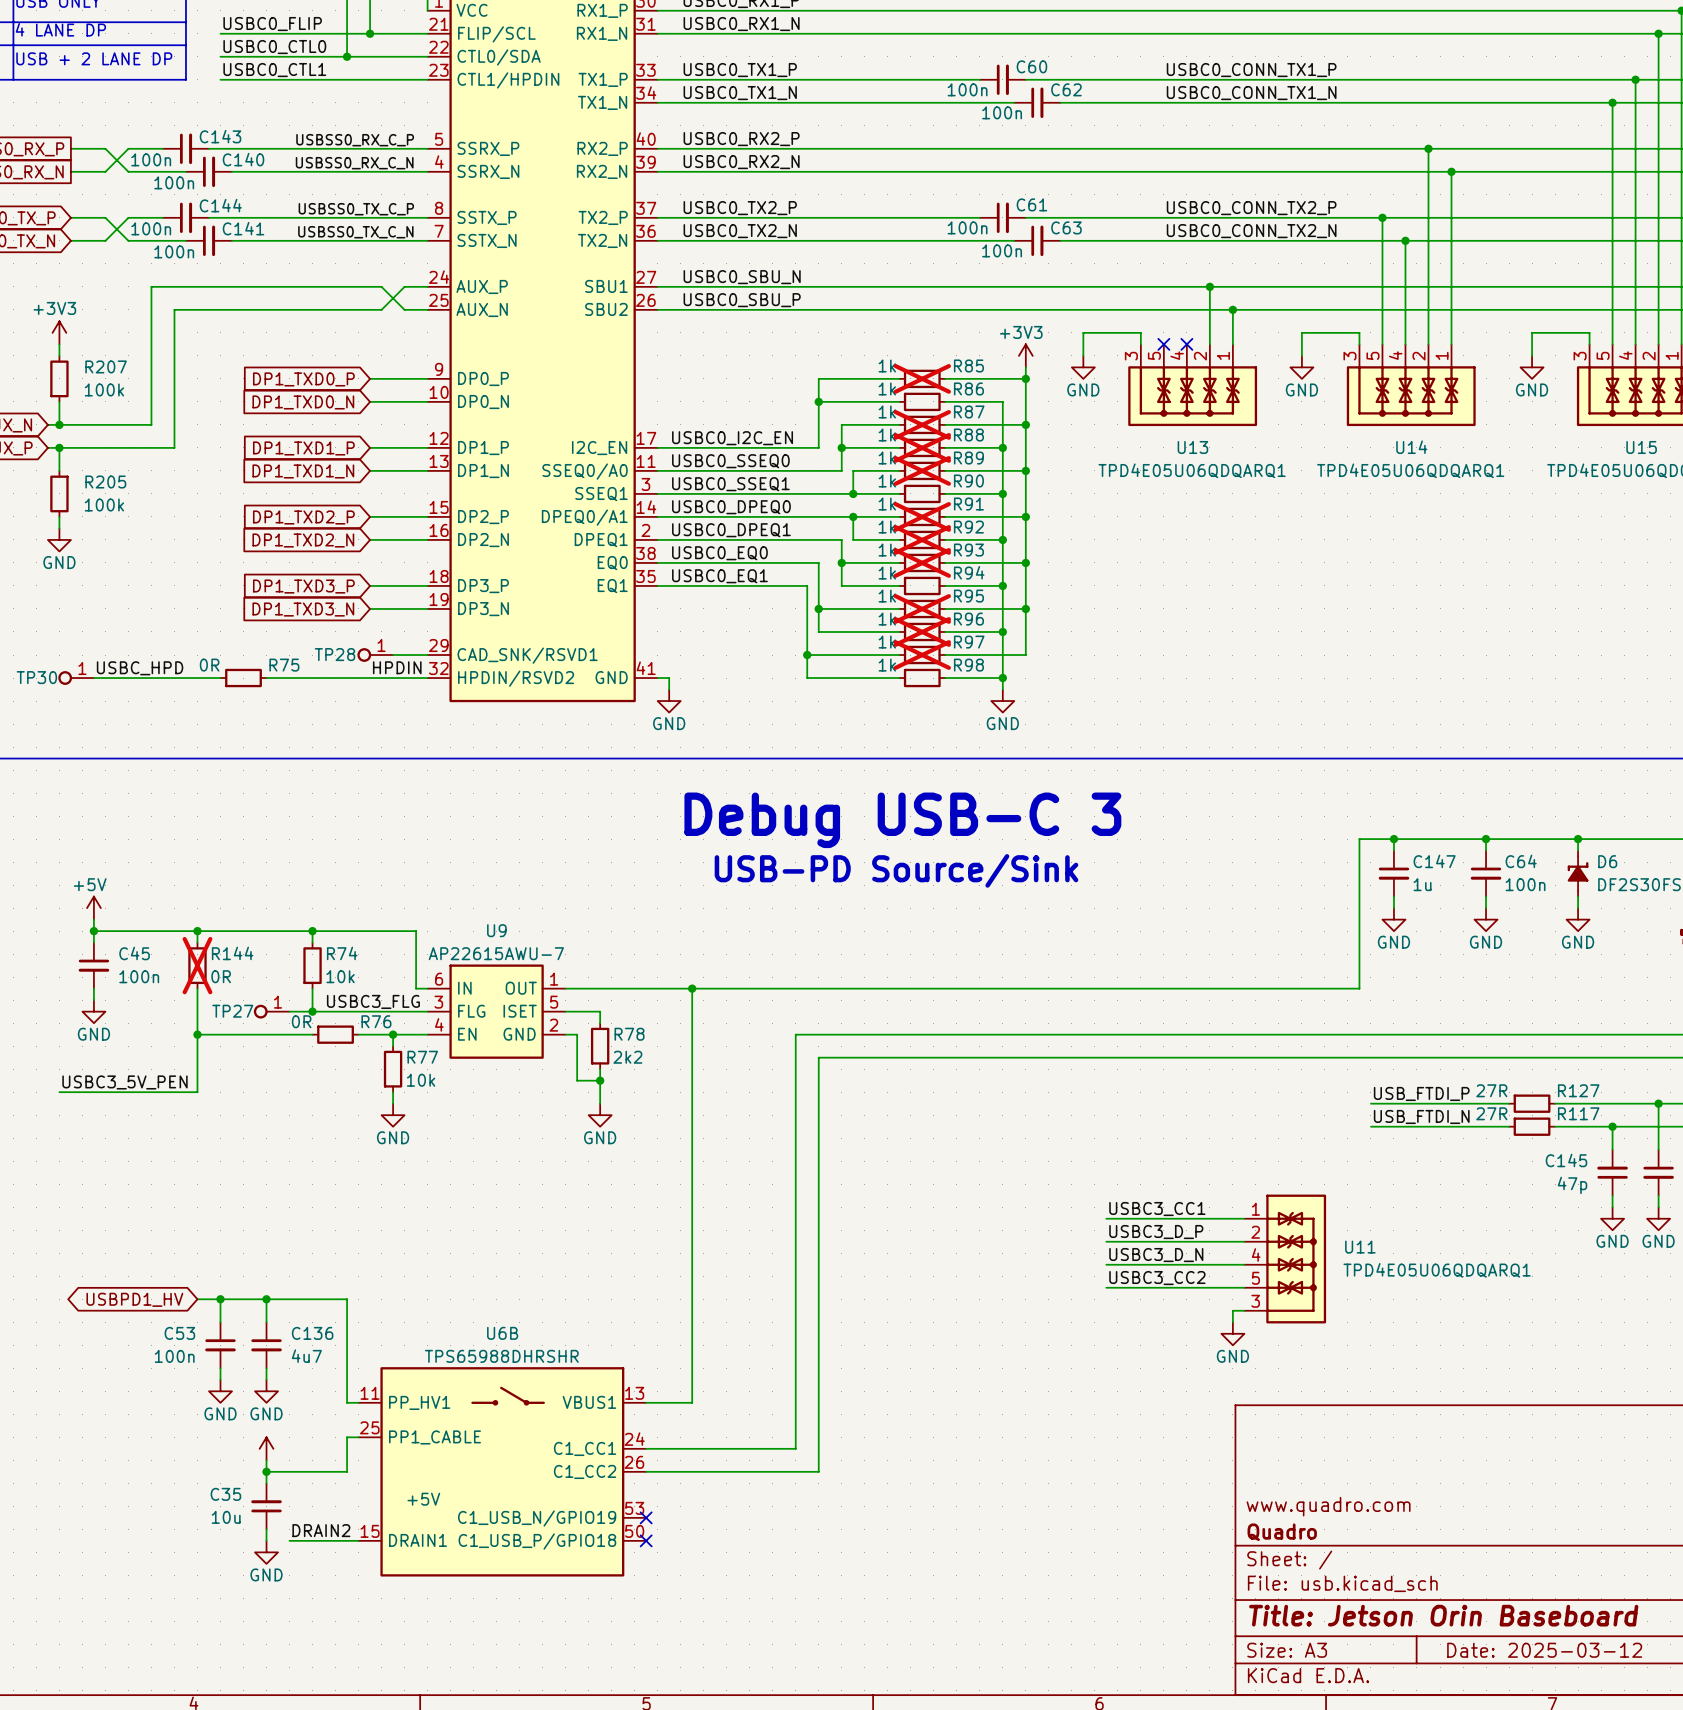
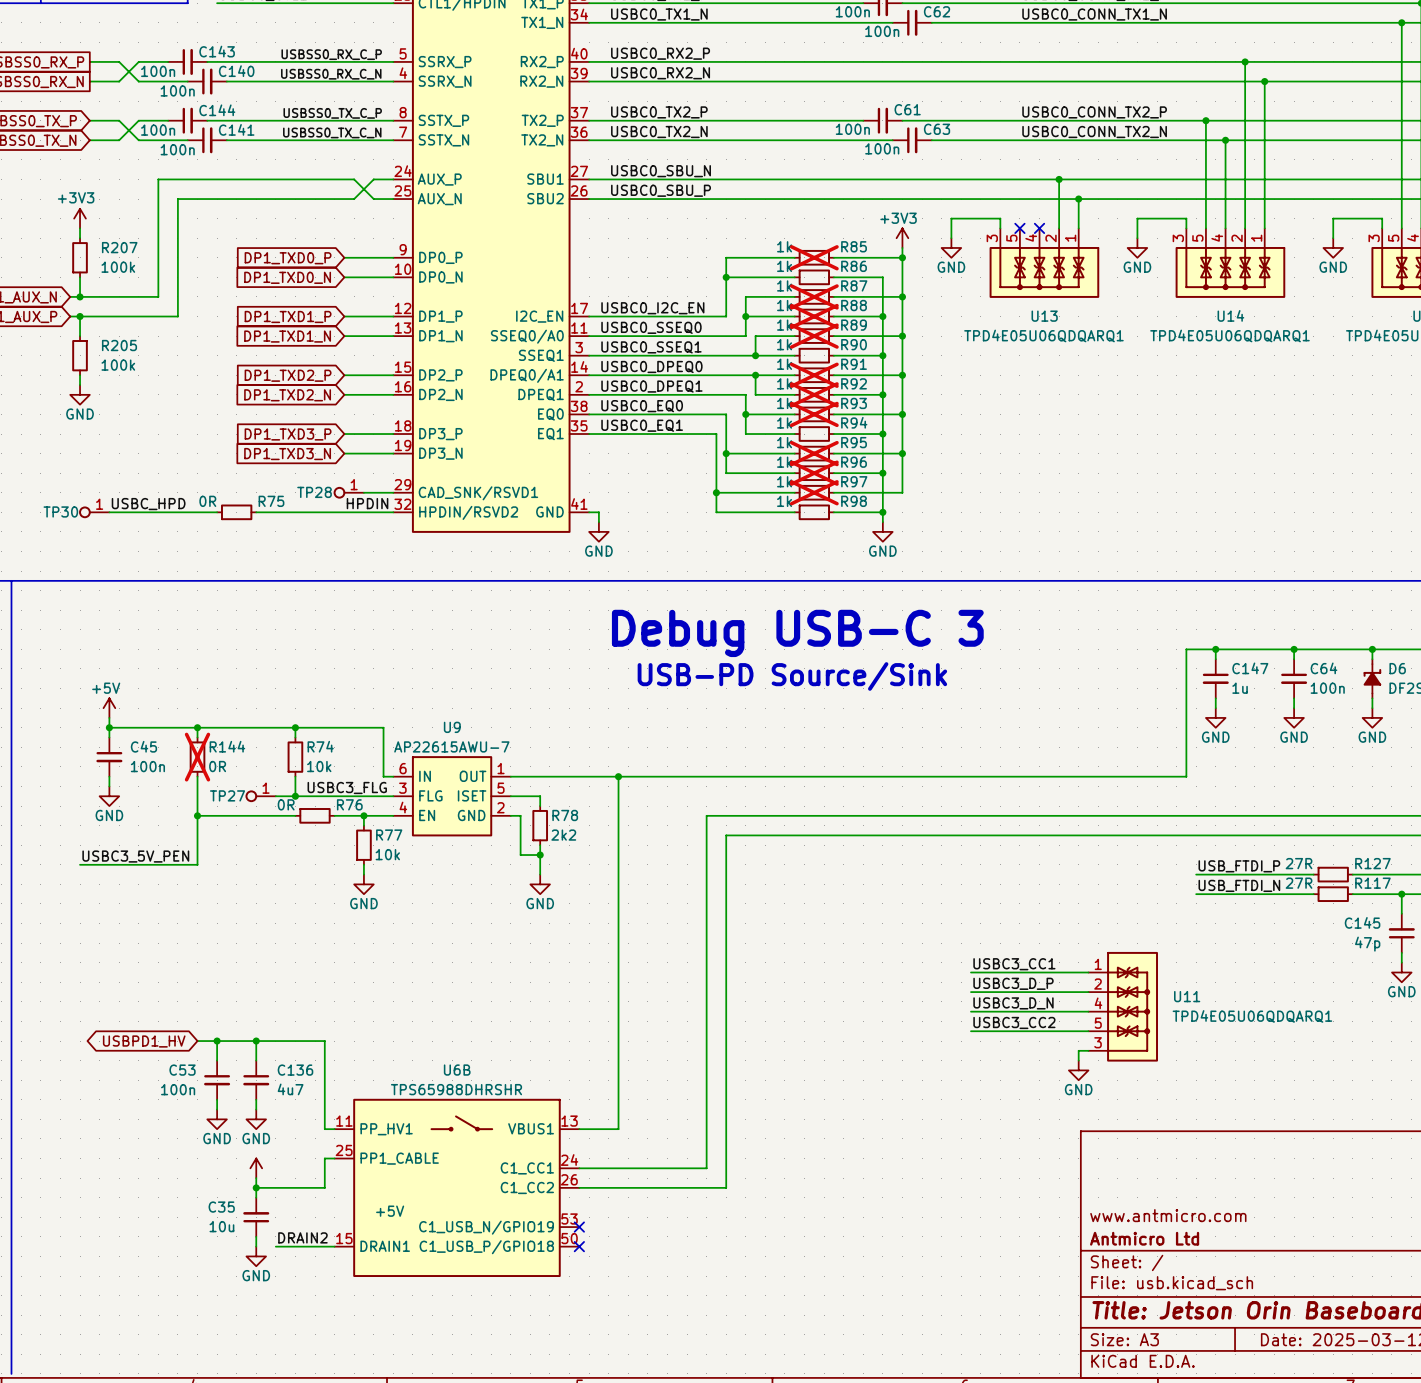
title block: www.quadro.com (1328, 1506) -> www.antmicro.com (1168, 1215)
title block: Quadro (1282, 1532) -> Antmicro Ltd (1144, 1238)

